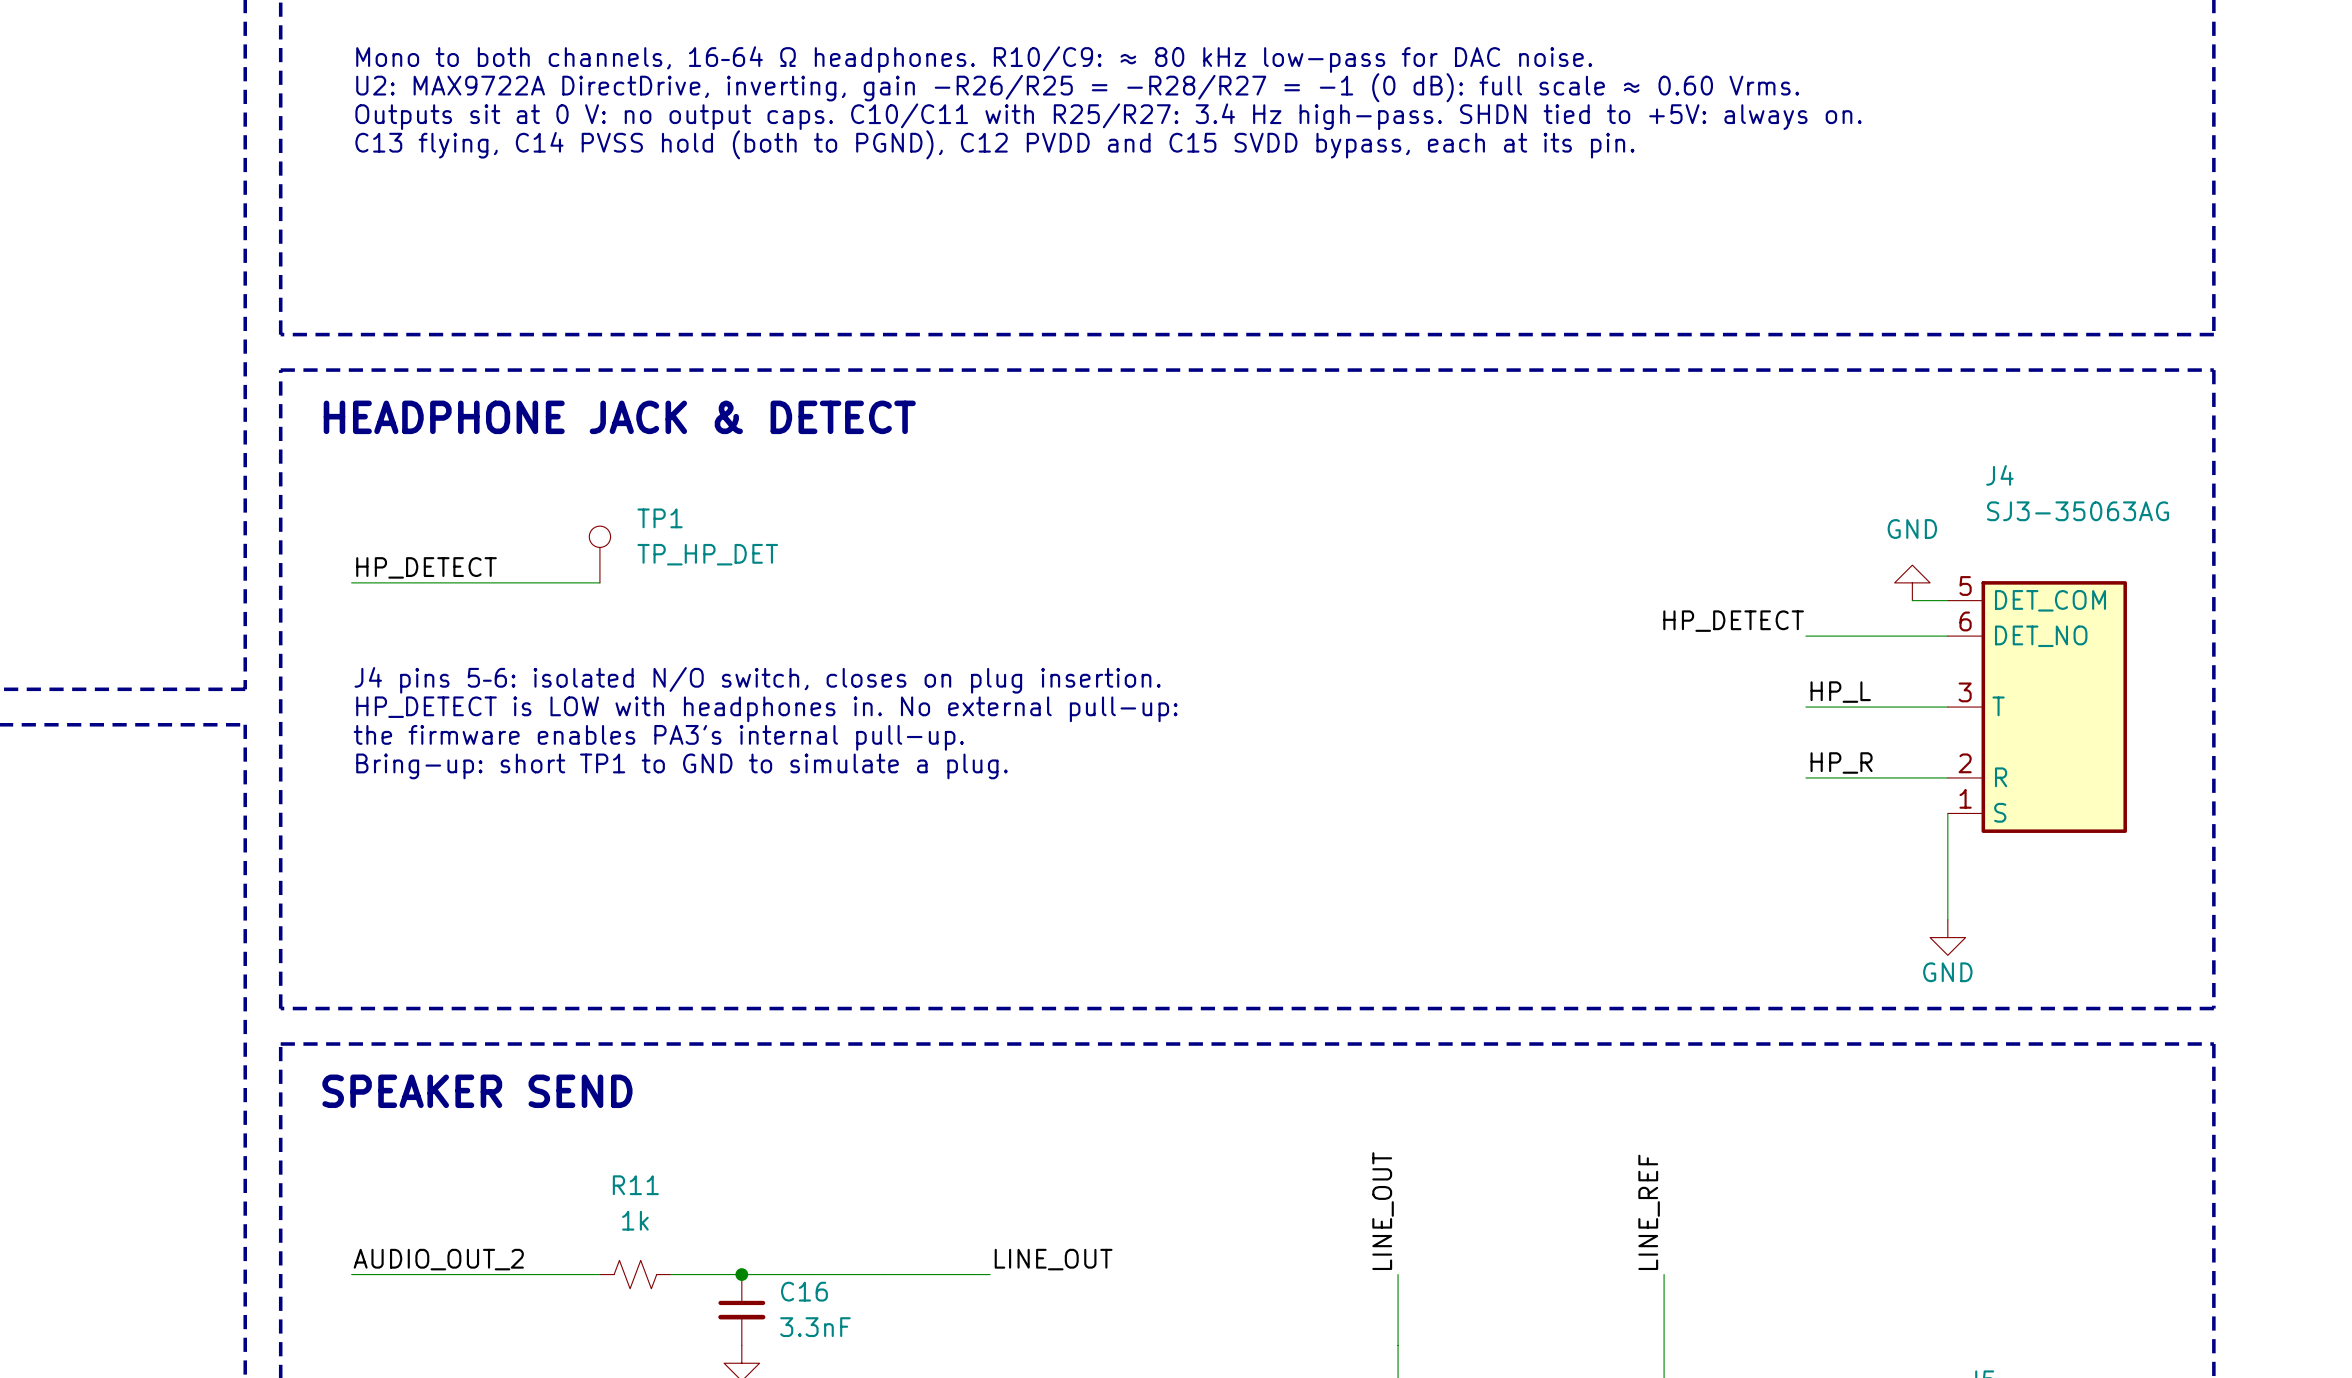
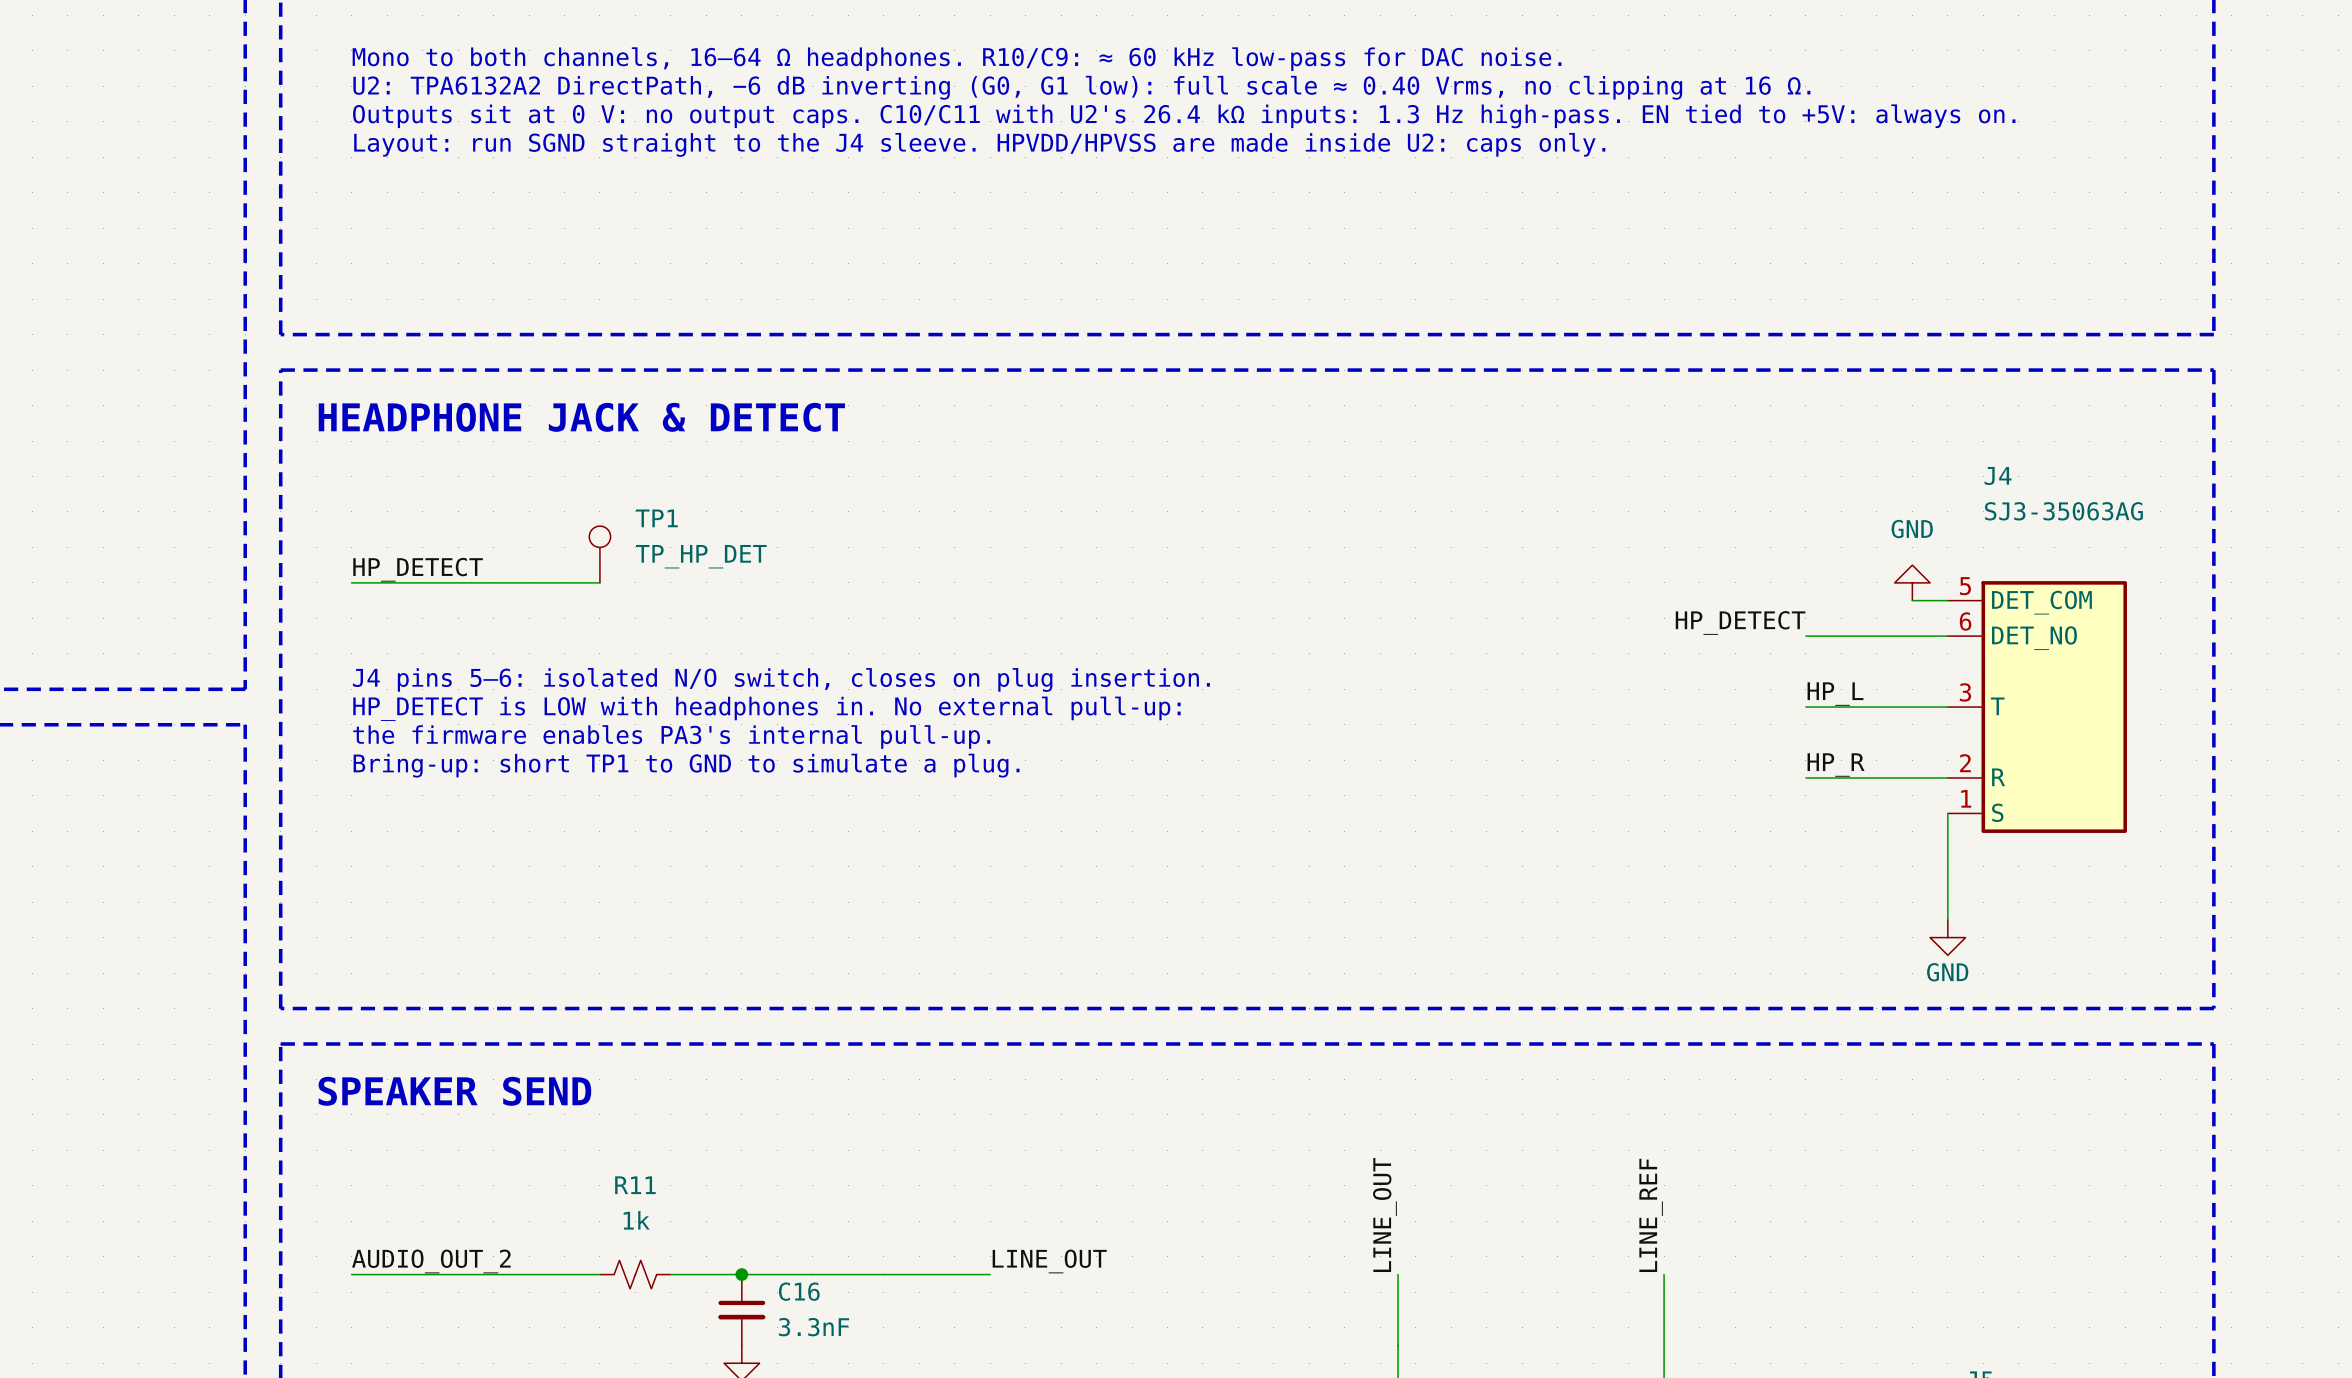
text: Mono to both channels, 16–64 Ω headphones. R10/C9: ≈ 80 kHz low-pass for DAC noise. (974, 59) -> Mono to both channels, 16–64 Ω headphones. R10/C9: ≈ 60 kHz low-pass for DAC noise. (957, 59)
text: U2: MAX9722A DirectDrive, inverting, gain −R26/R25 = −R28/R27 = −1 (0 dB): full scale ≈ 0.60 Vrms. (1077, 87) -> U2: TPA6132A2 DirectPath, −6 dB inverting (G0, G1 low): full scale ≈ 0.40 Vrms, no clipping at 16 Ω. (1081, 87)
text: Outputs sit at 0 V: no output caps. C10/C11 with R25/R27: 3.4 Hz high-pass. SHDN tied to +5V: always on. (1108, 116) -> Outputs sit at 0 V: no output caps. C10/C11 with U2's 26.4 kΩ inputs: 1.3 Hz high-pass. EN tied to +5V: always on. (1184, 116)
text: C13 flying, C14 PVSS hold (both to PGND), C12 PVDD and C15 SVDD bypass, each at its pin. (994, 144) -> Layout: run SGND straight to the J4 sleeve. HPVDD/HPVSS are made inside U2: caps only. (979, 144)

